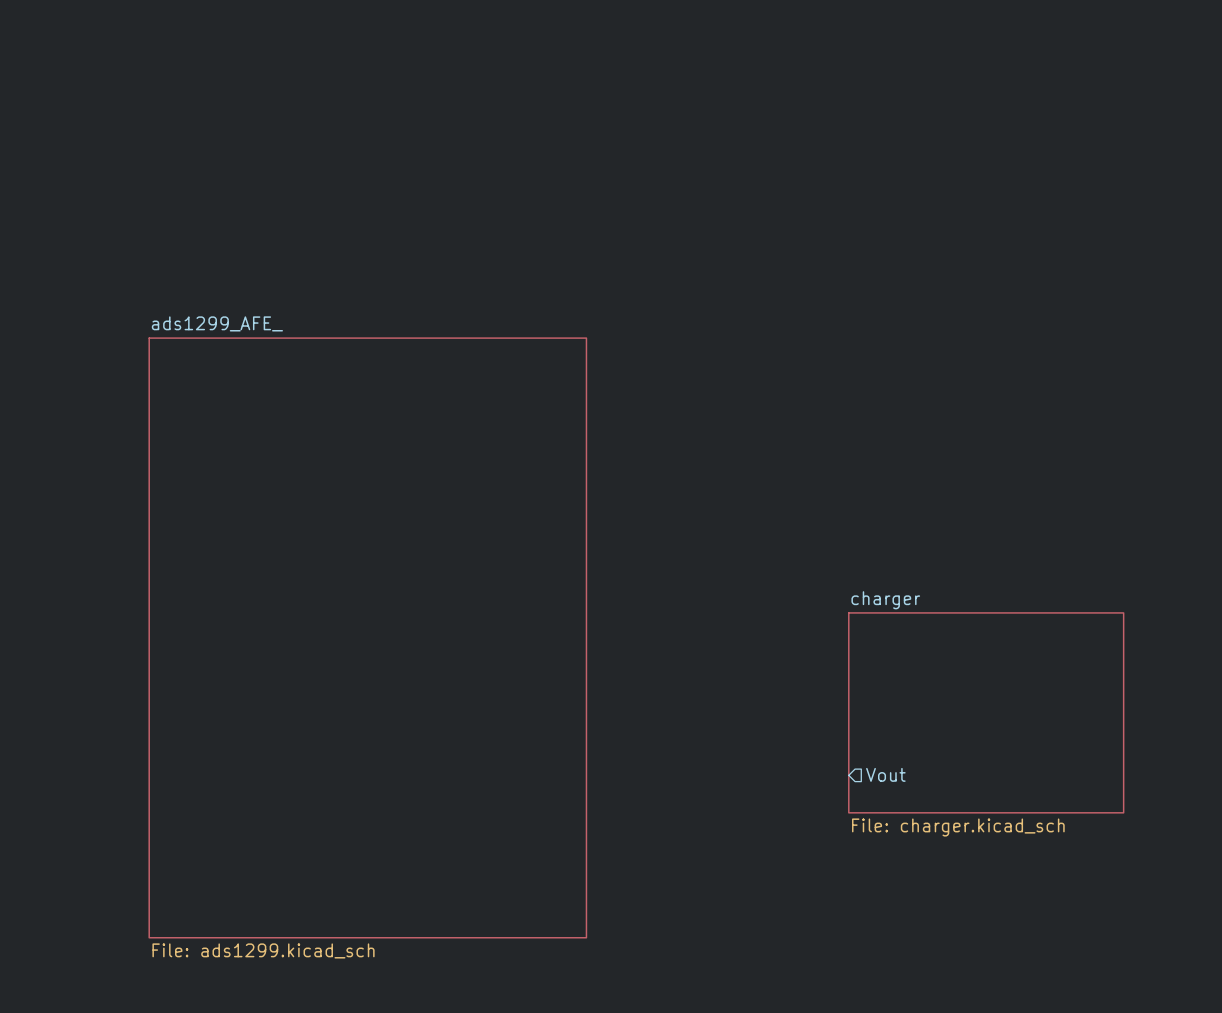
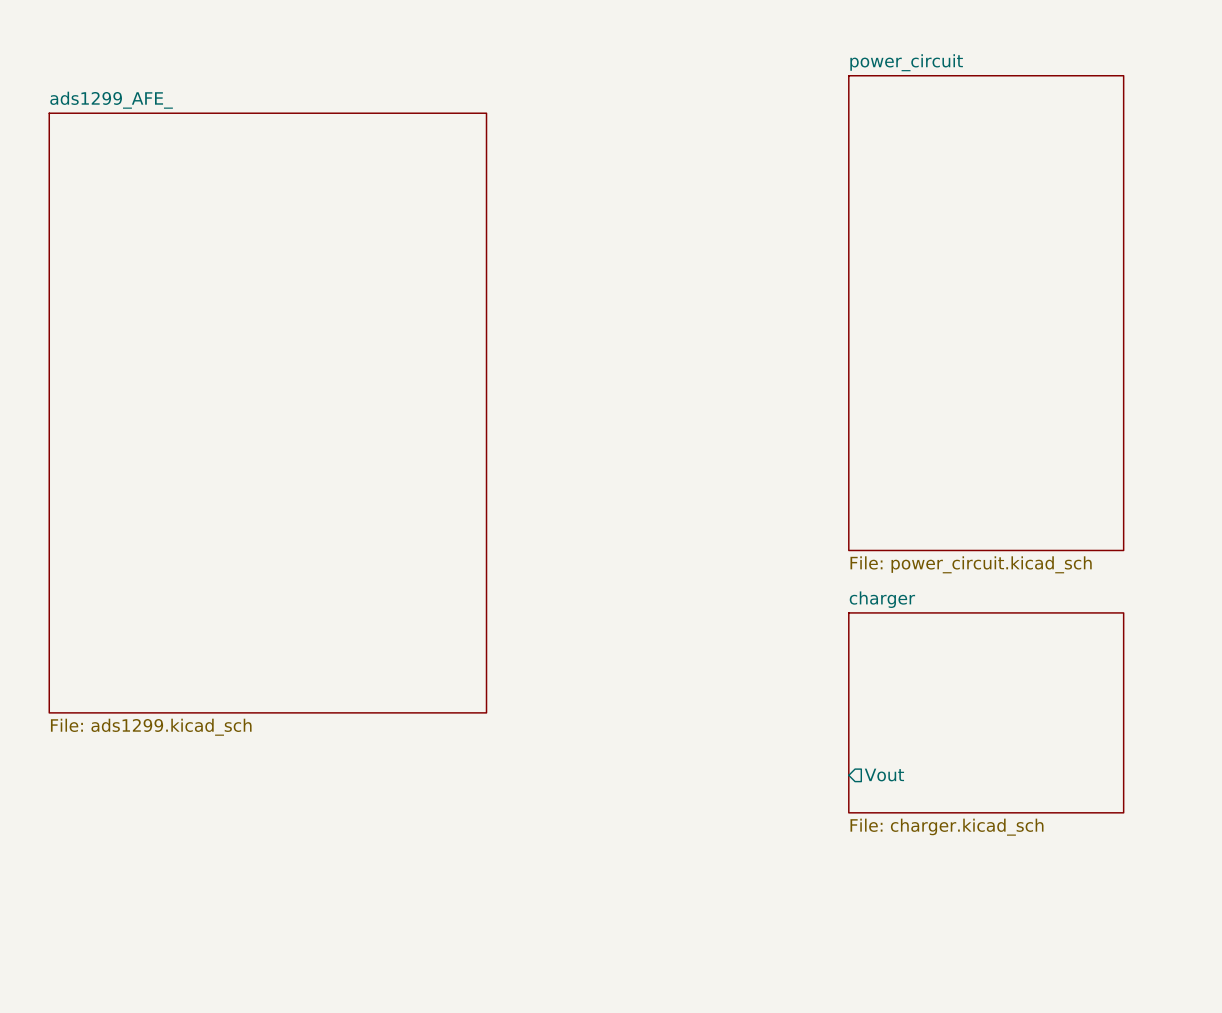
sheet power_circuit: none -> File: power_circuit.kicad_sch (986, 313)
sheet ads1299_AFE_ position: (367, 637) -> (267, 413)

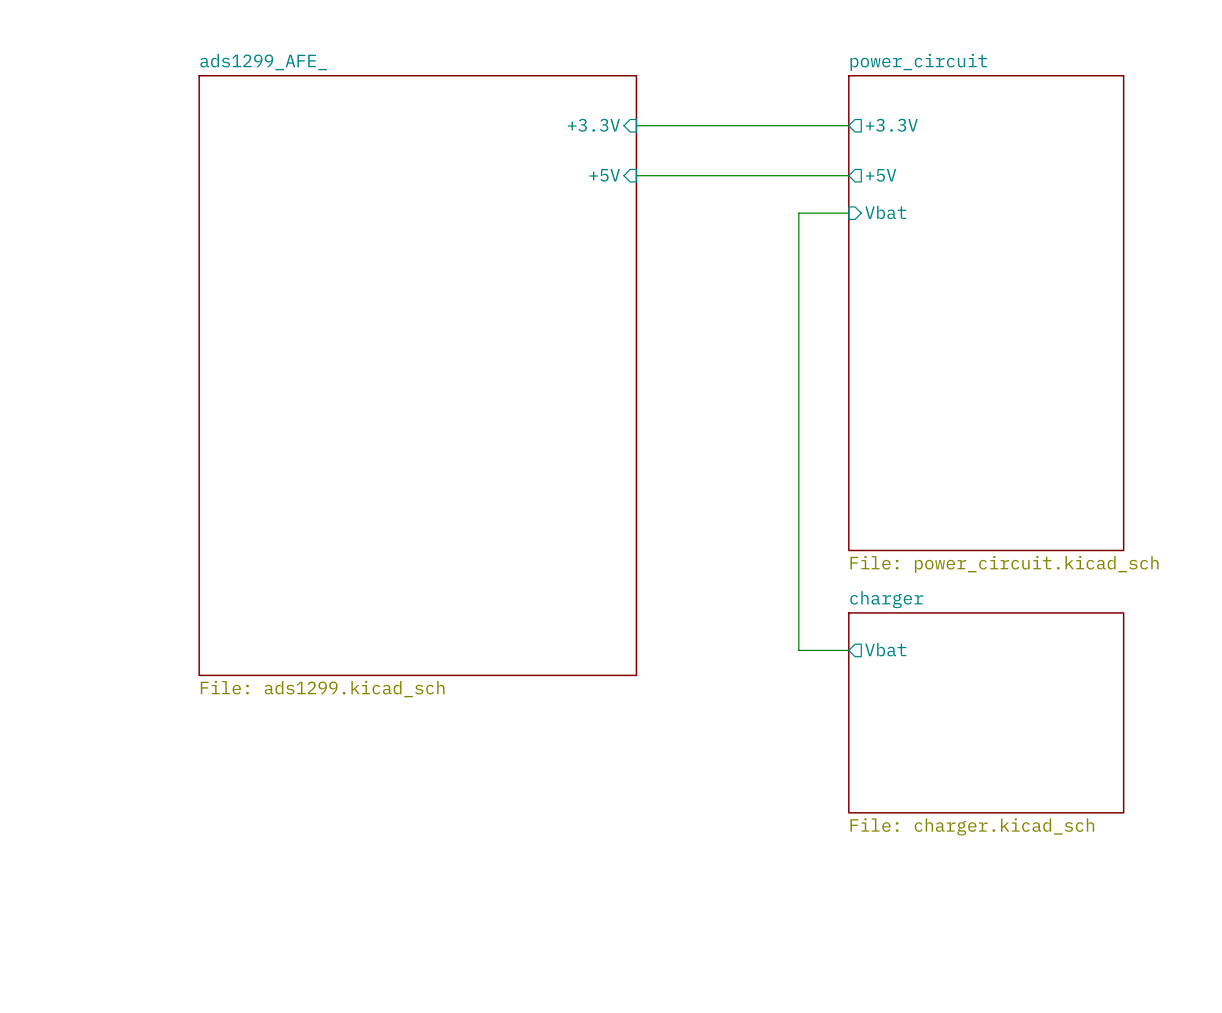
sheet pin: none -> +3.3V (593, 125)
wire: none -> (636, 125) (848, 125)
sheet pin: none -> +3.3V (891, 125)
sheet pin: none -> +5V (604, 175)
wire: none -> (636, 175) (848, 175)
sheet pin: none -> +5V (881, 175)
sheet pin: none -> Vbat (885, 212)
wire: none -> (848, 213) (798, 213) (798, 650) (848, 650)
sheet ads1299_AFE_ position: (267, 413) -> (417, 375)
sheet pin: none -> Vbat (885, 649)
sheet pin: Vout (884, 775) -> none

